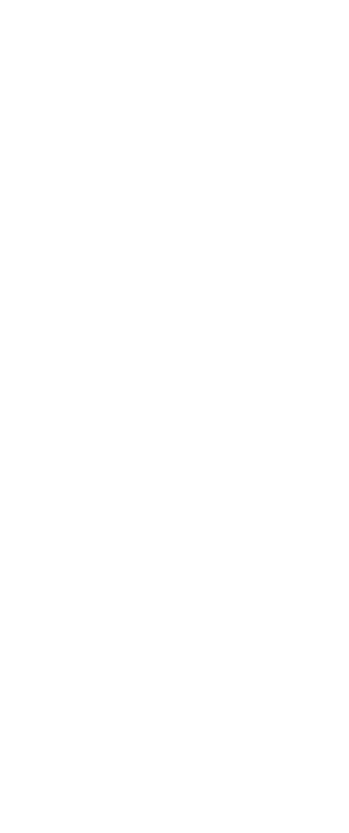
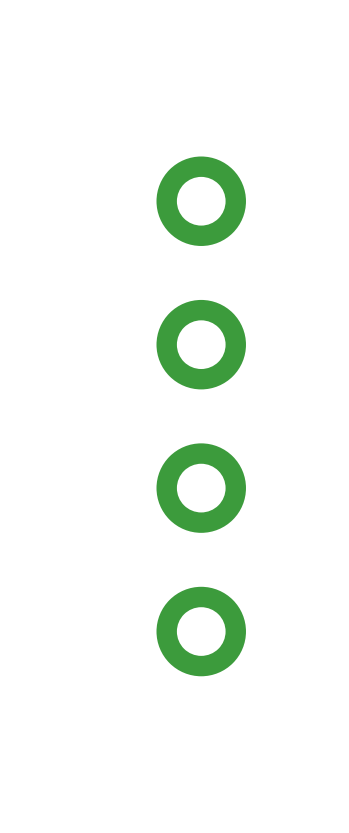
part: none -> (201, 201)
part: none -> (201, 344)
part: none -> (201, 488)
part: none -> (201, 631)

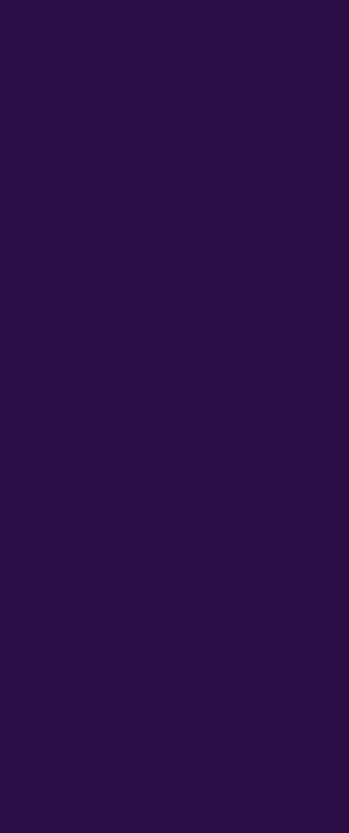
part: (201, 201) -> none
part: (201, 344) -> none
part: (201, 488) -> none
part: (201, 631) -> none

